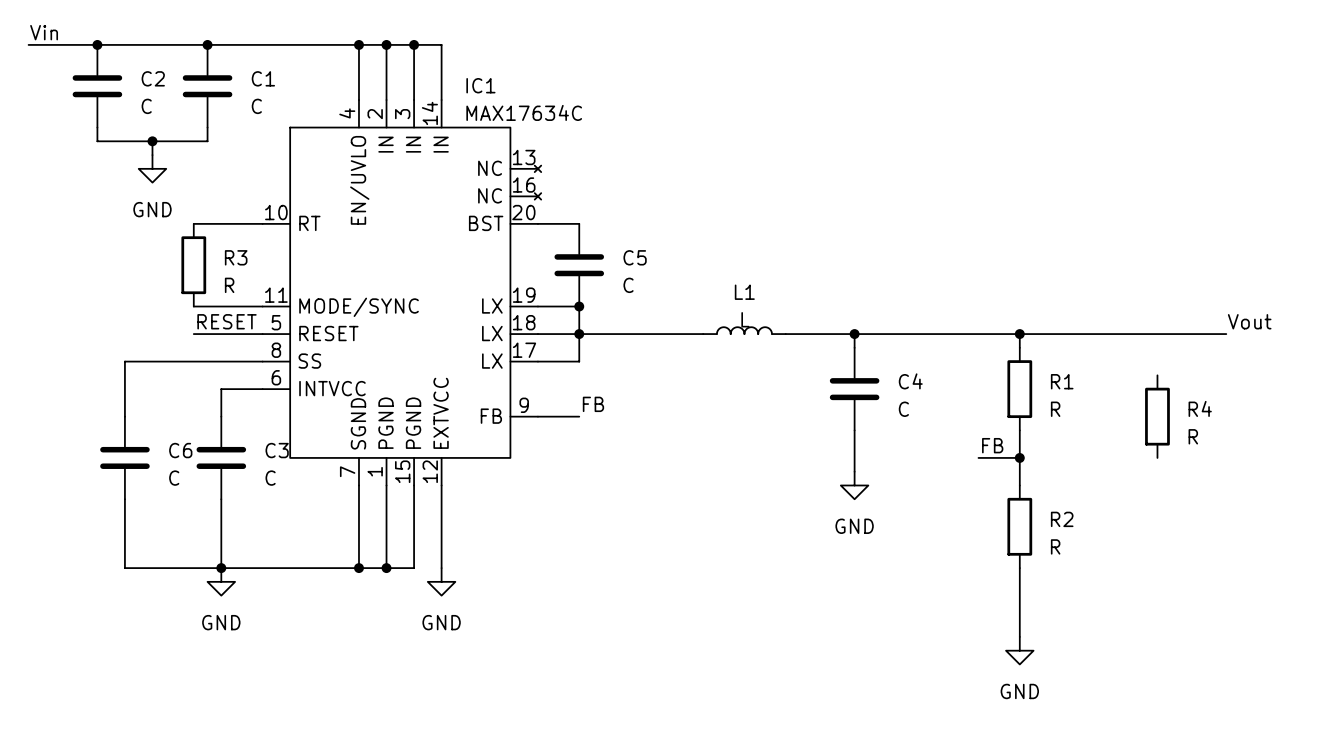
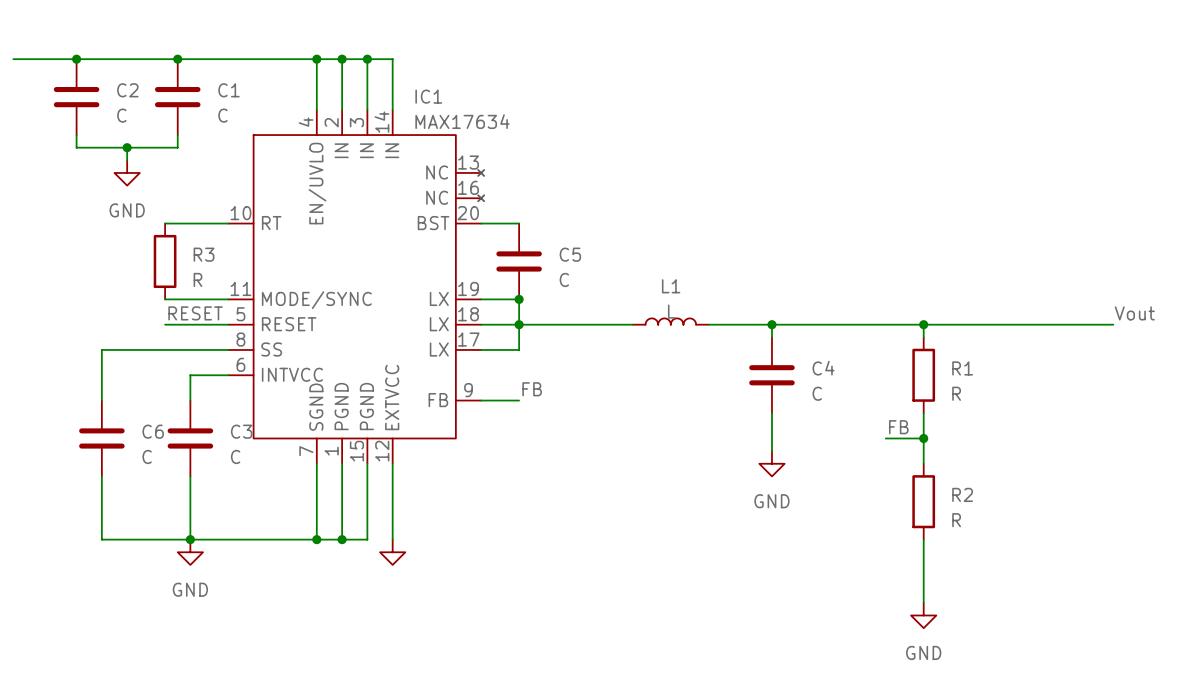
label: Vin (44, 32) -> none
IC1 value: MAX17634C (524, 112) -> MAX17634 (462, 121)
R4: R (1157, 416) -> none
power symbol text: GND (441, 622) -> none

